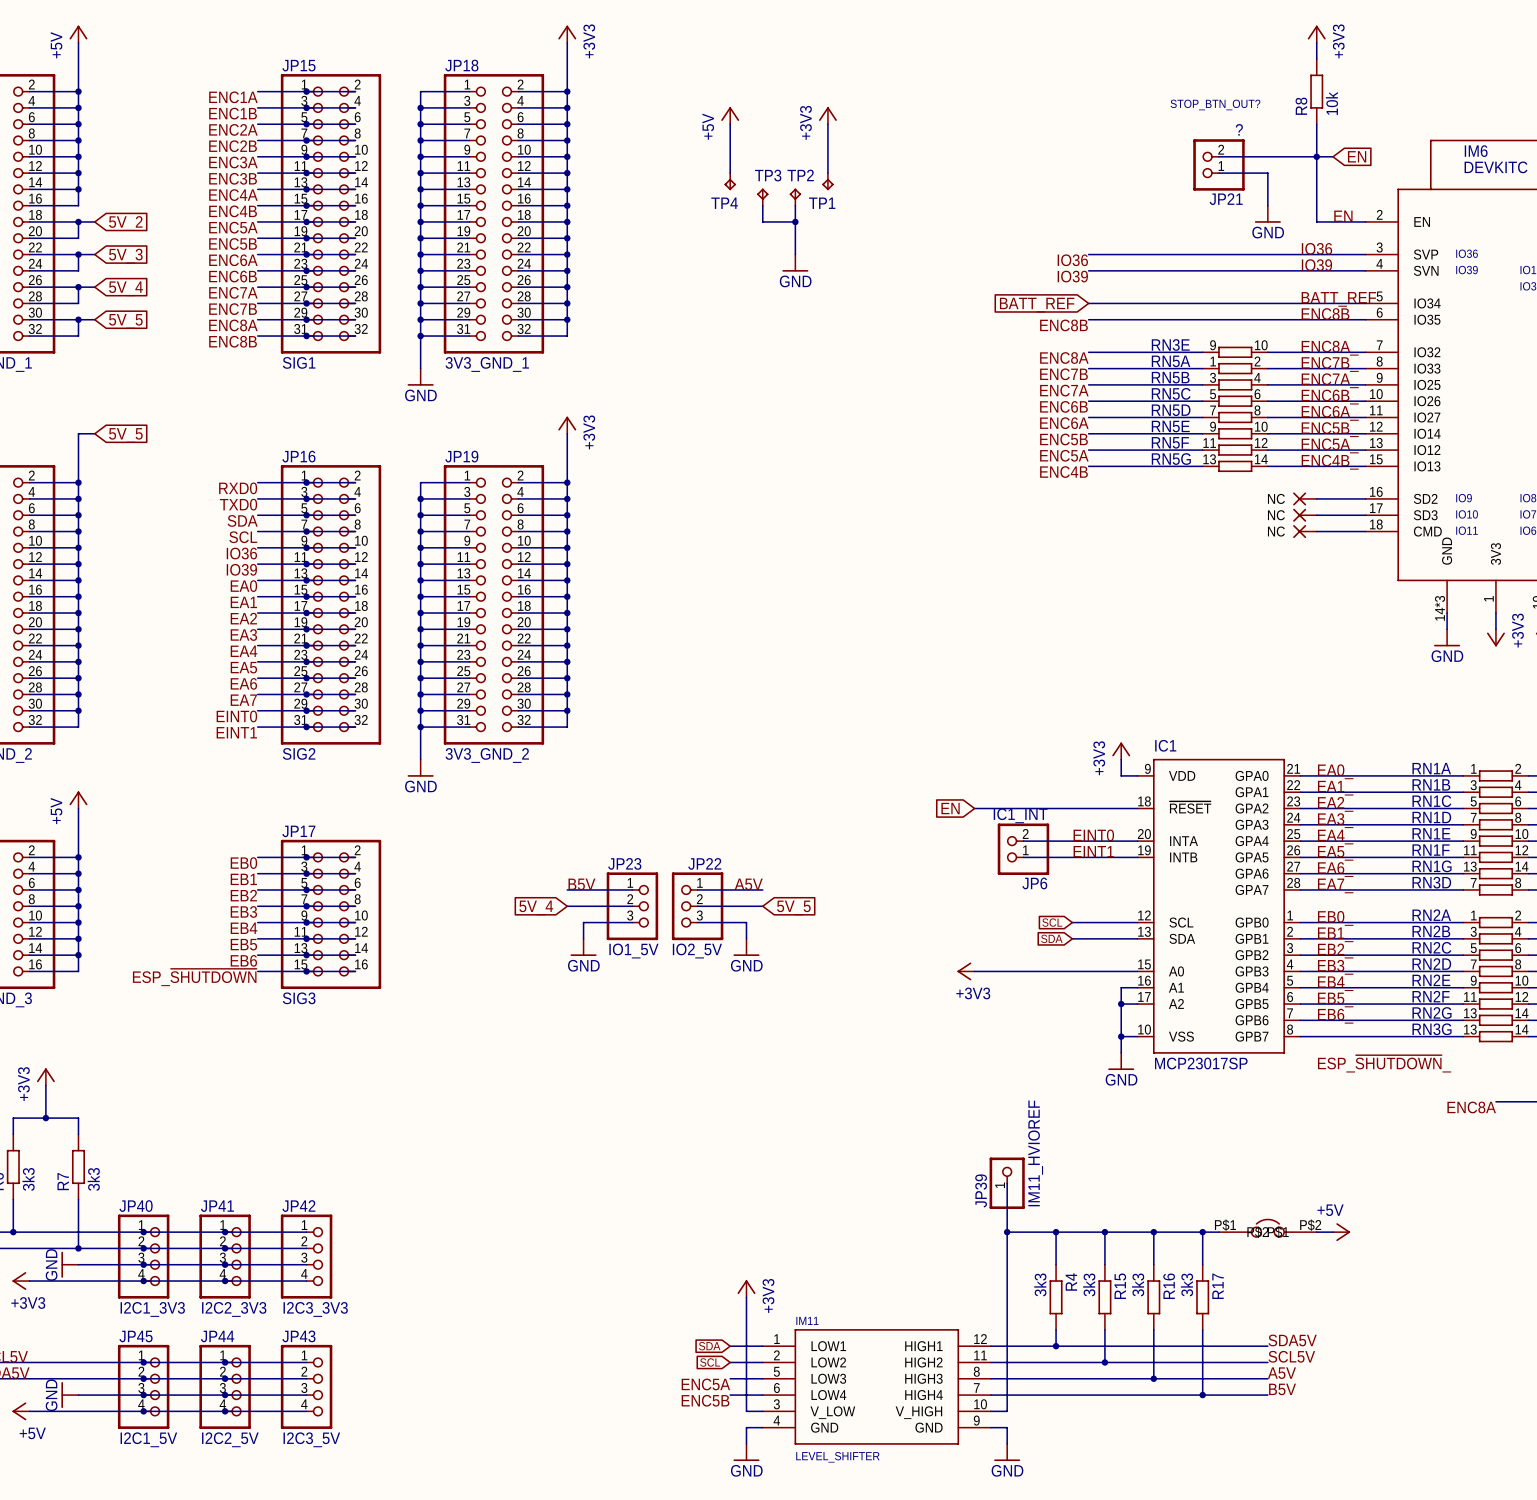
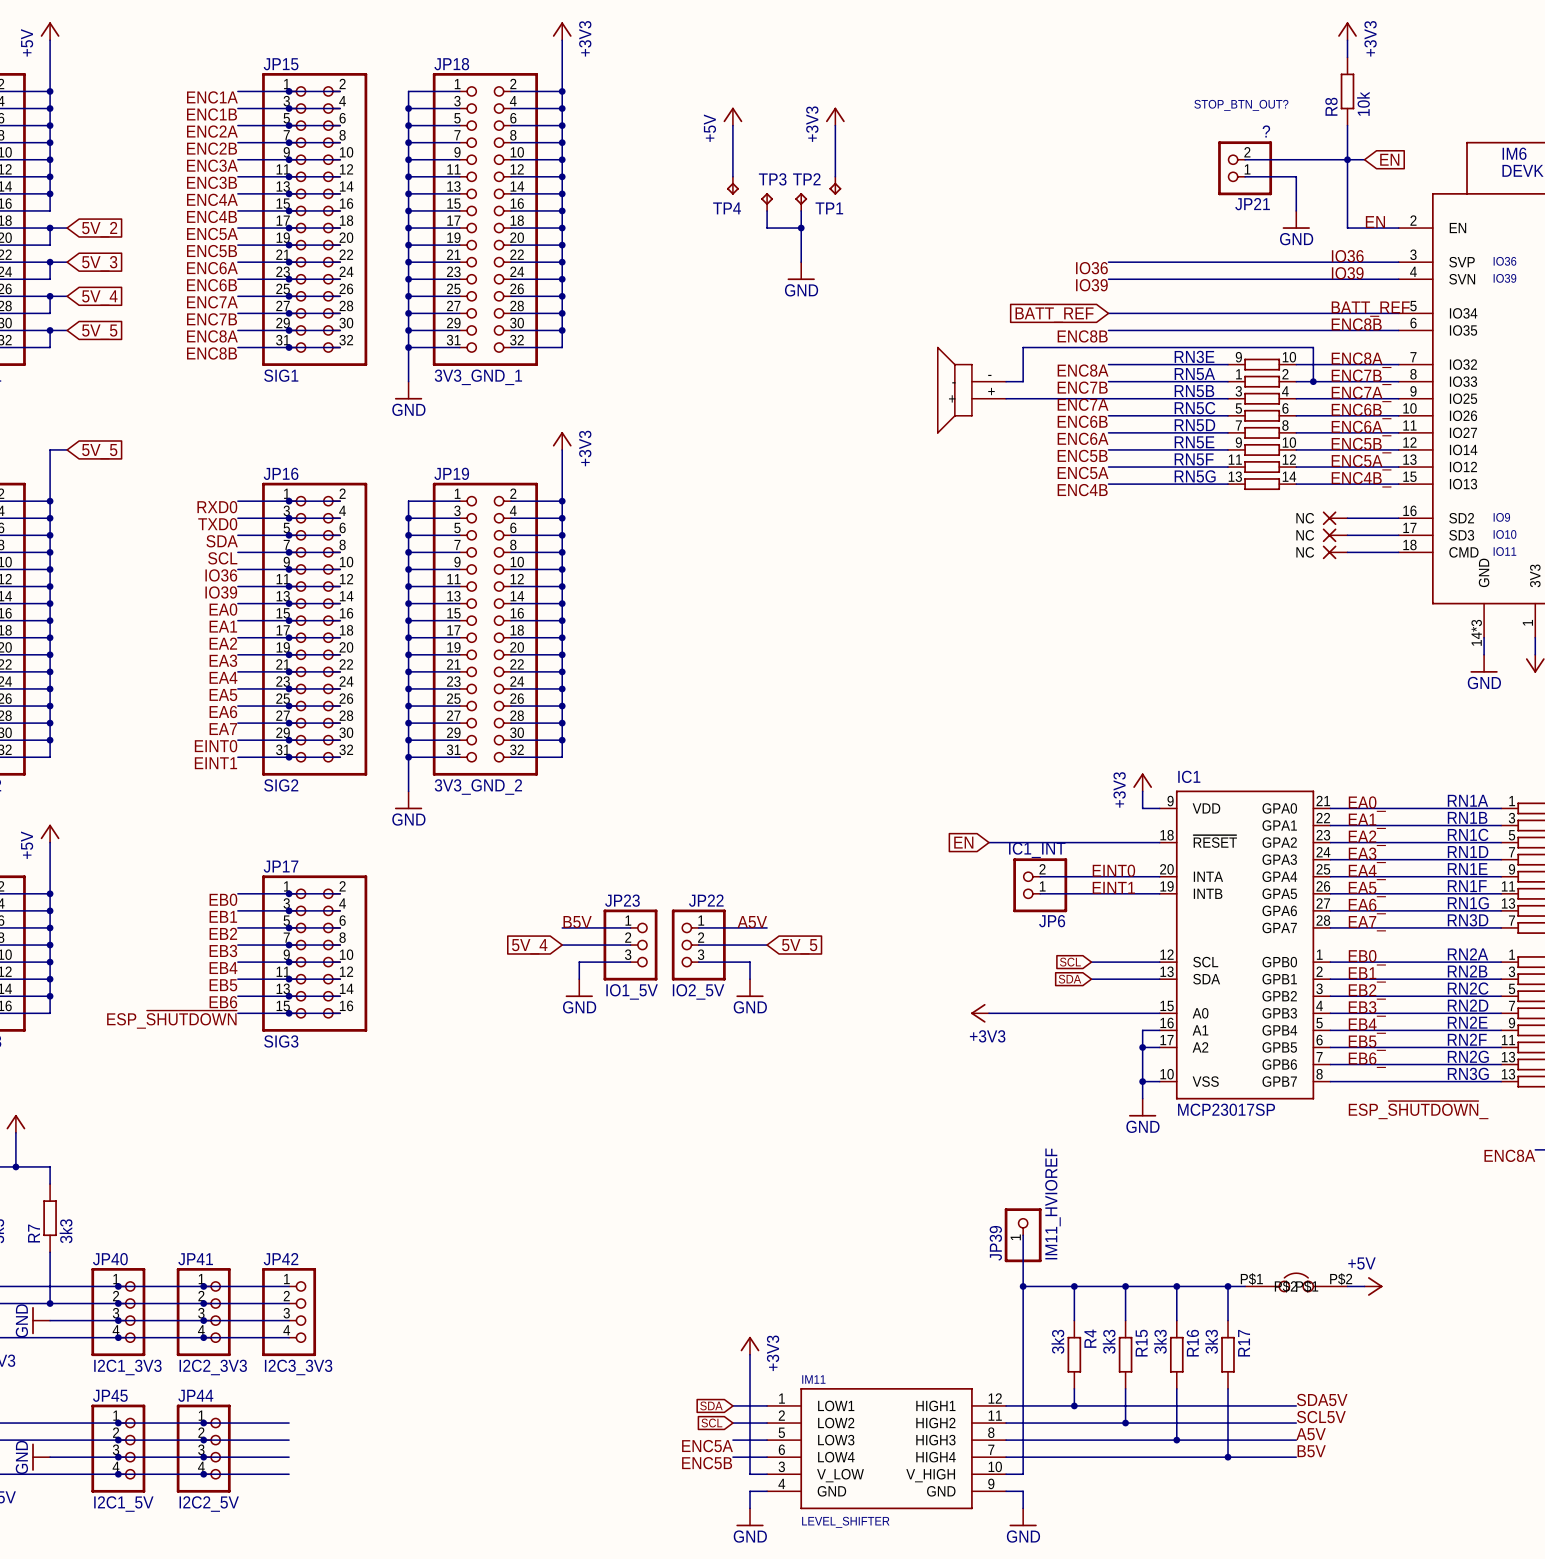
wire: none -> (1006, 381) (1023, 381) (1023, 347) (1313, 347) (1313, 381)
junction: none -> (1313, 381)
part: none -> (971, 390)
wire: none -> (1006, 398) (1108, 398)
JP43: I2C3_5V (306, 1386) -> none

